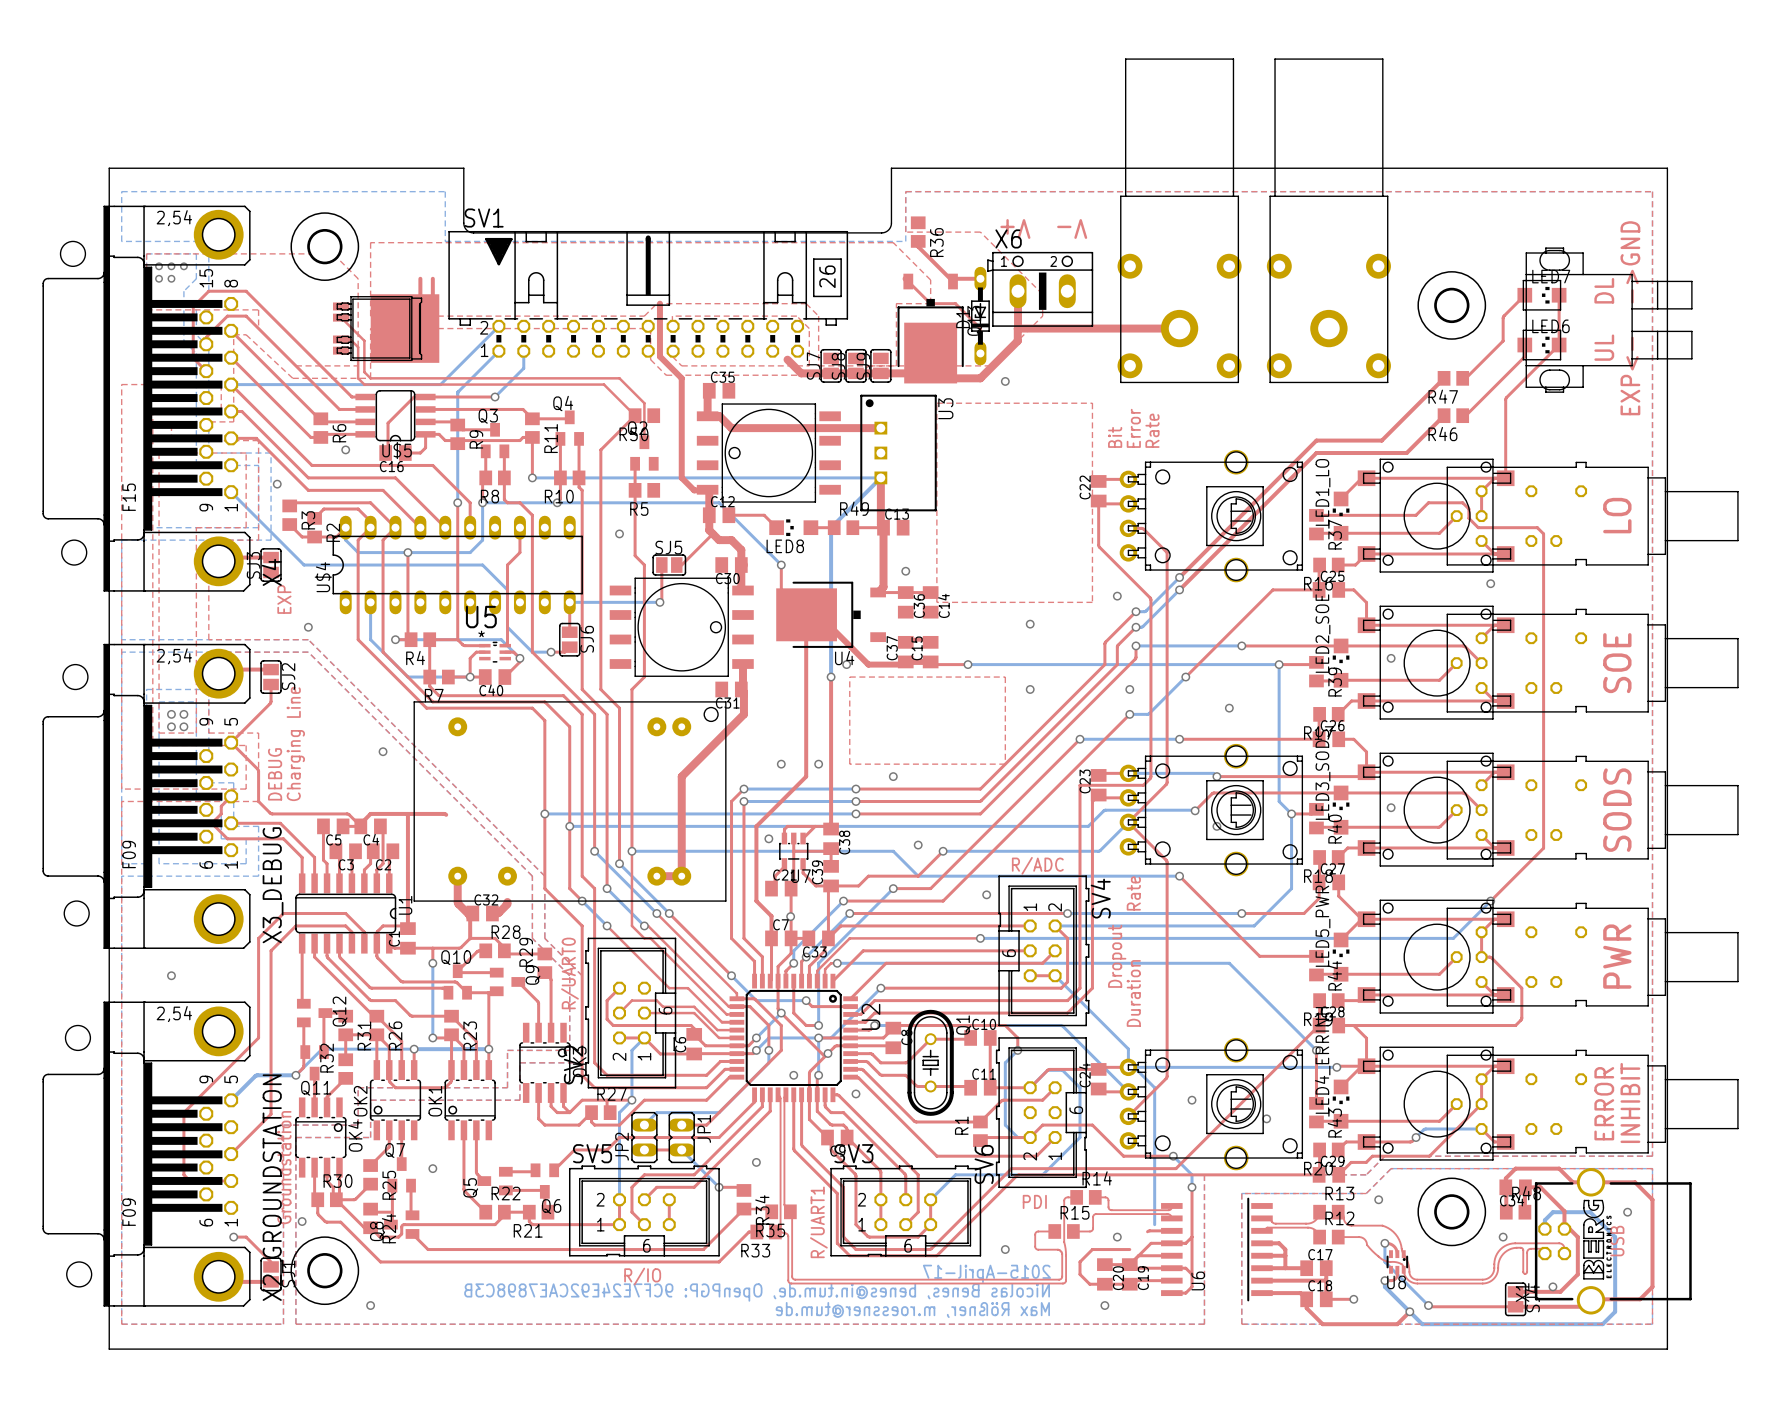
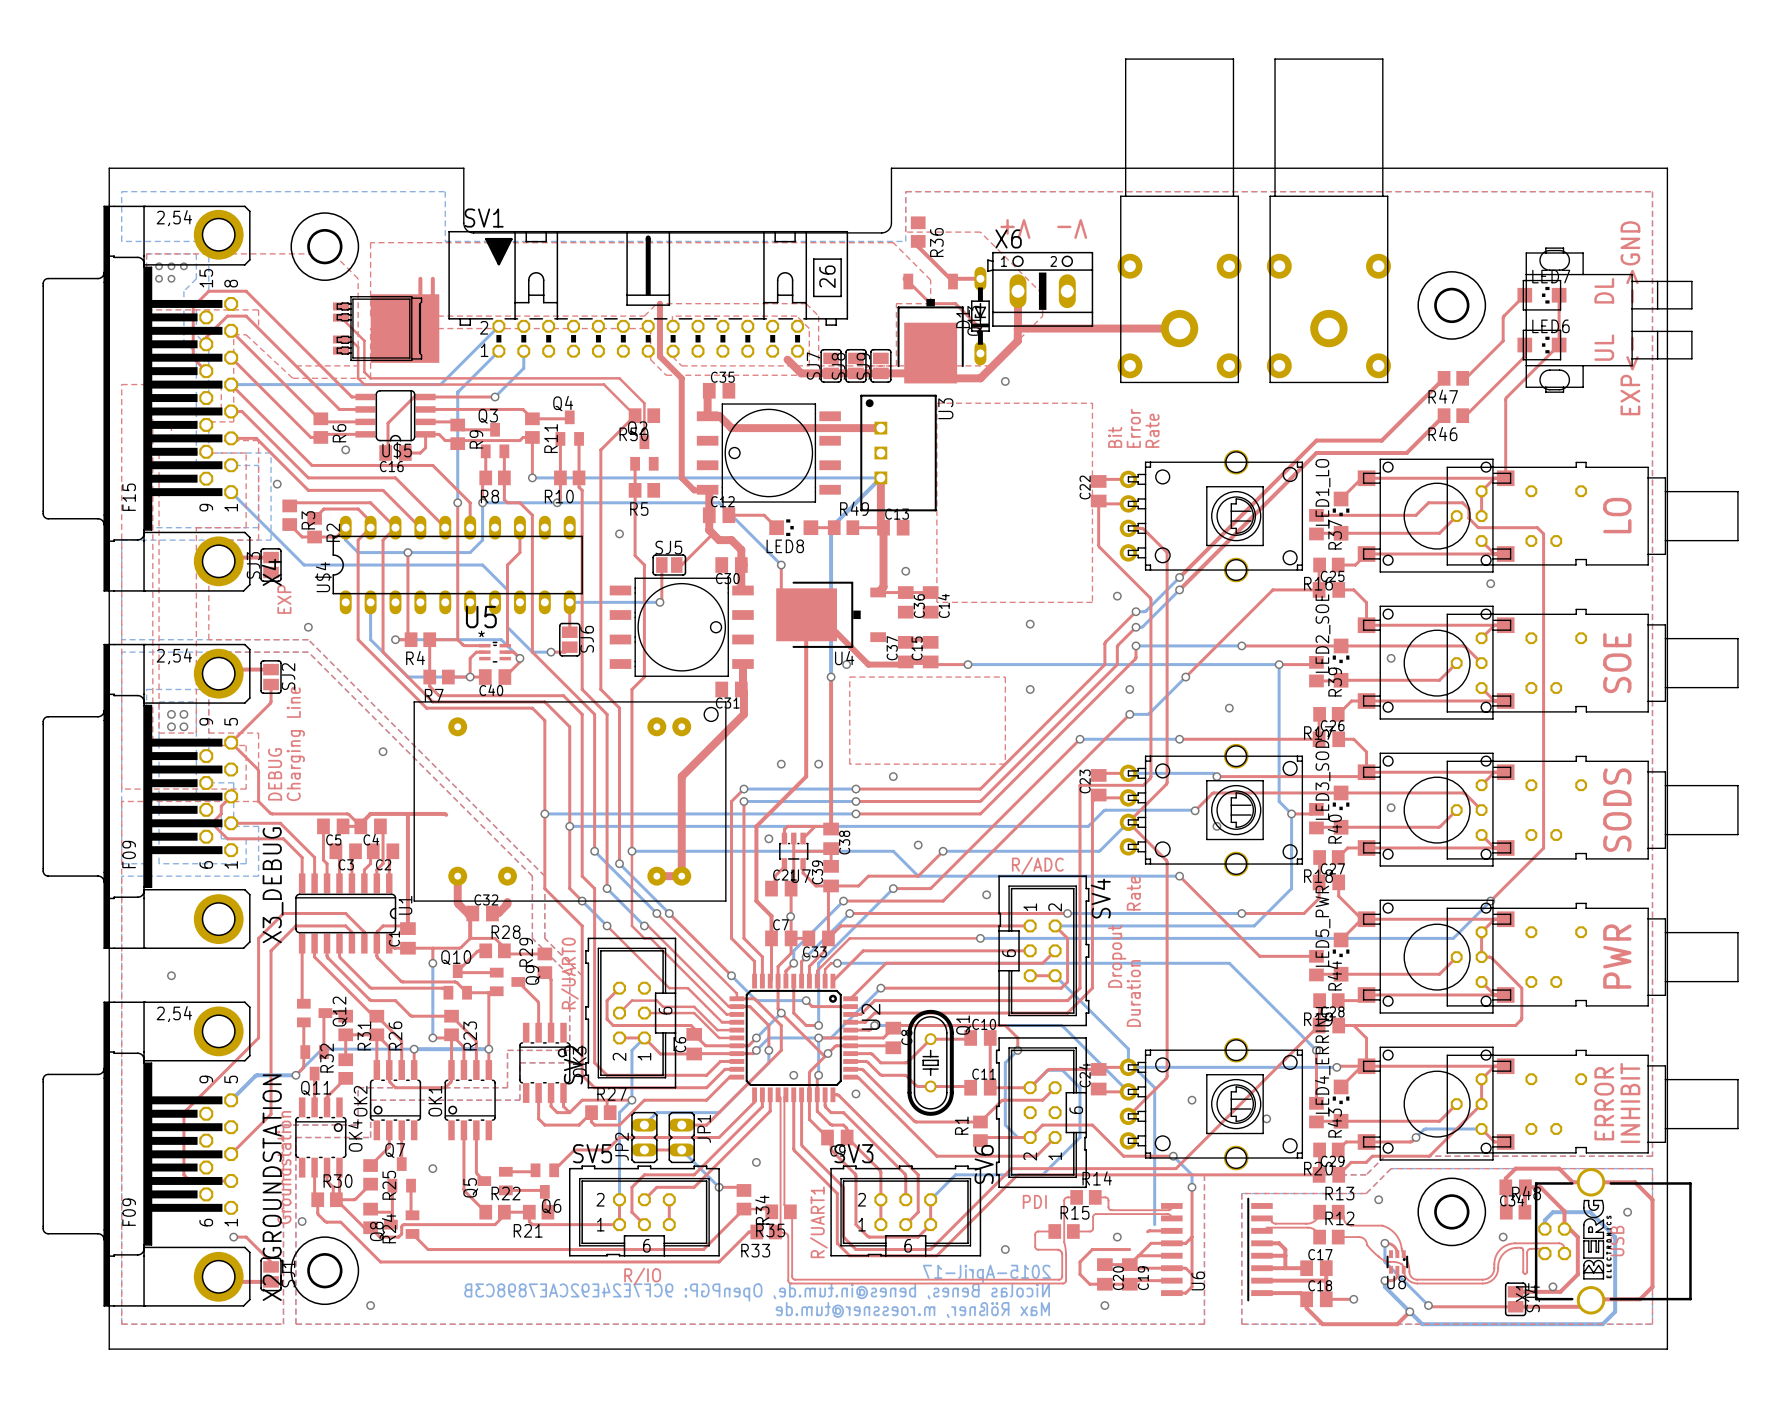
drawing: [59, 240, 87, 267] -> none
drawing: [61, 539, 88, 566] -> none
drawing: [62, 663, 89, 691] -> none
drawing: [63, 900, 90, 927] -> none
drawing: [64, 1024, 92, 1052] -> none
drawing: [66, 1261, 93, 1288] -> none

